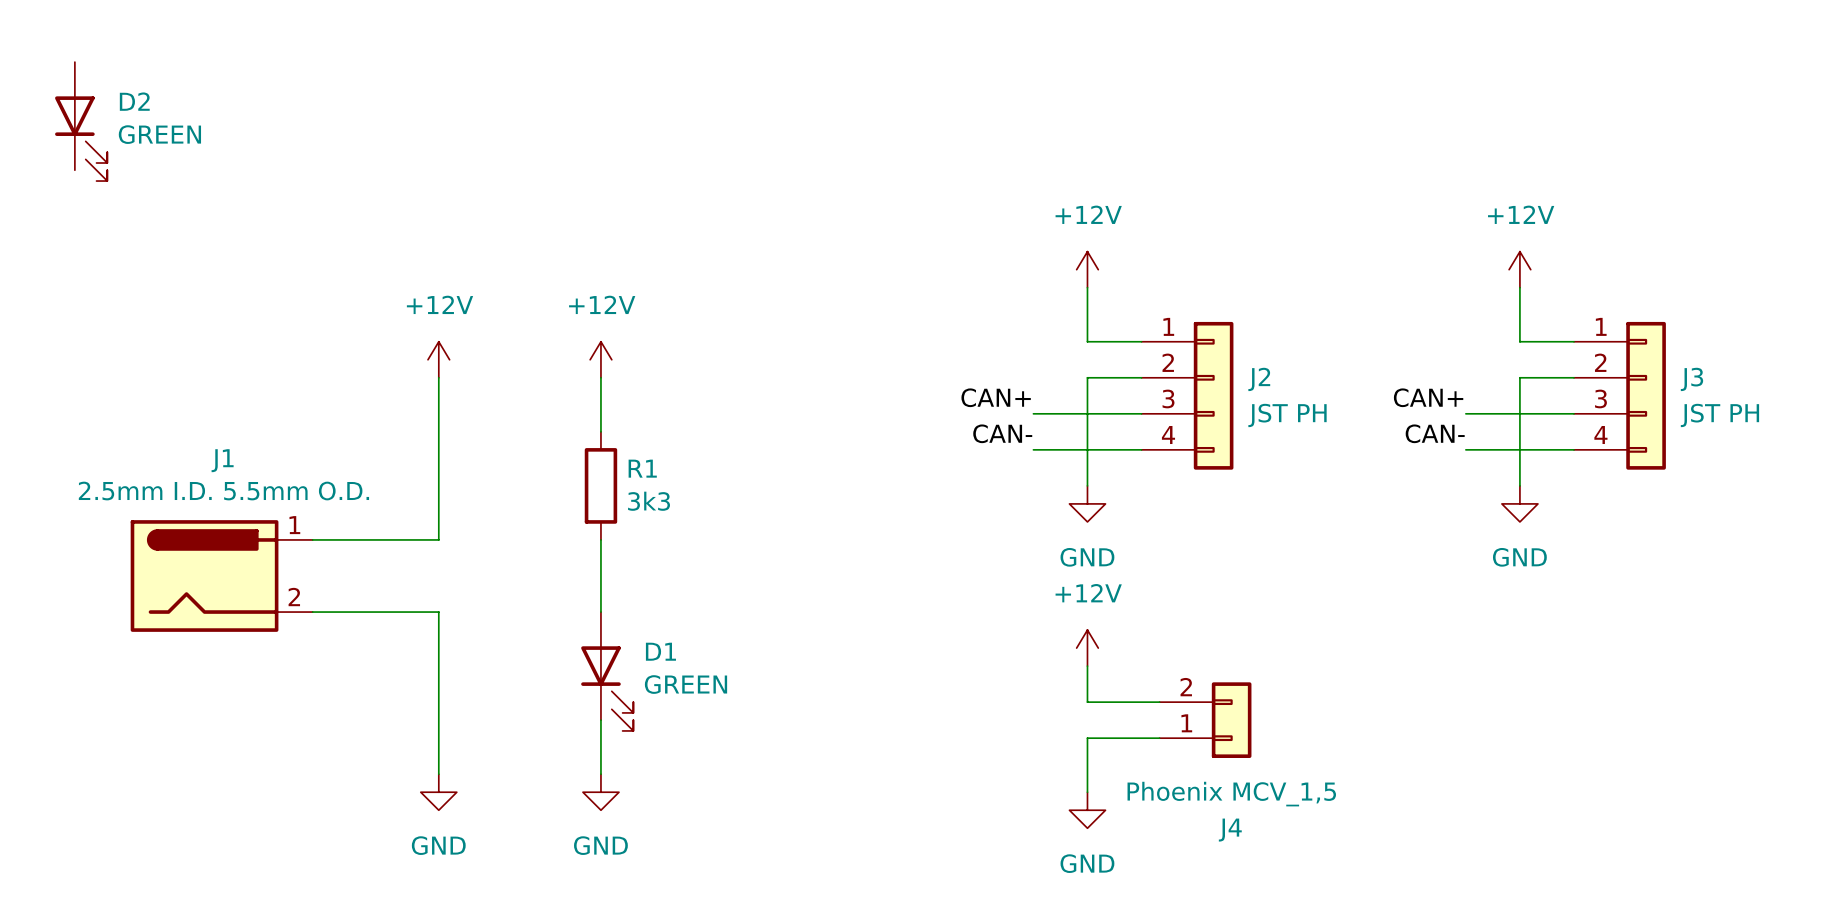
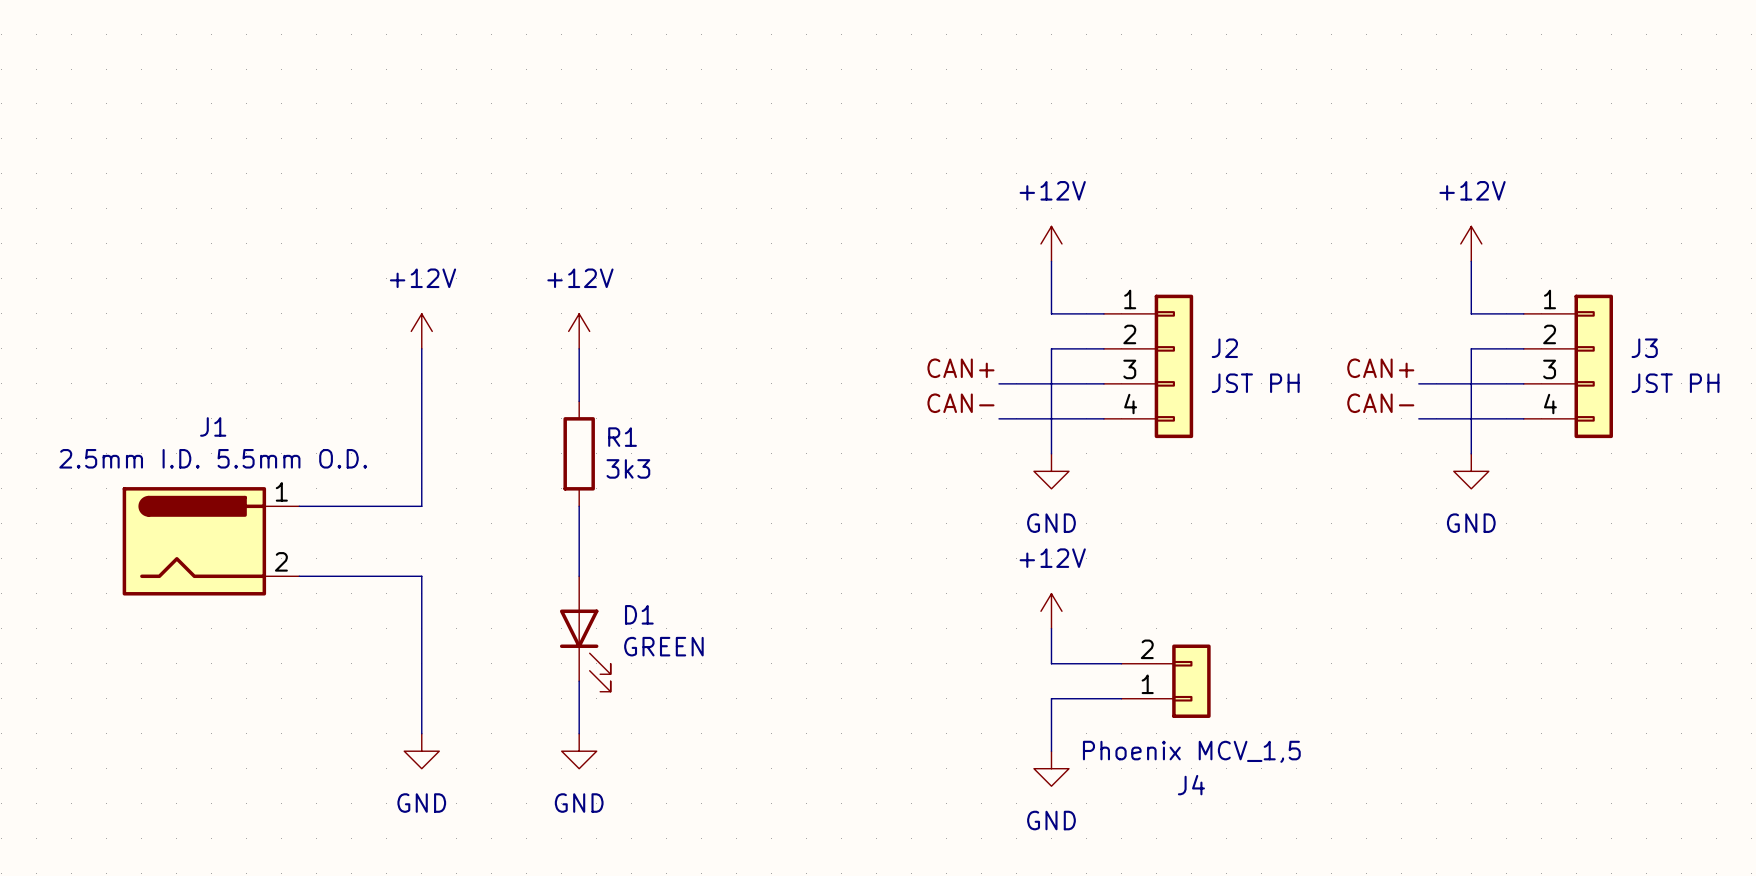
D2: GREEN (81, 121) -> none

